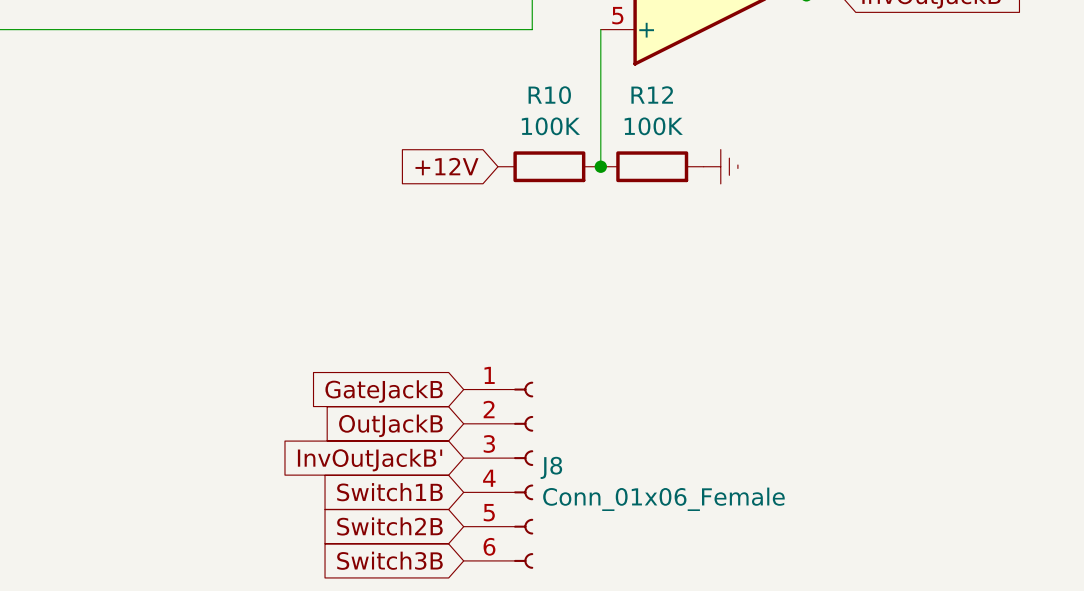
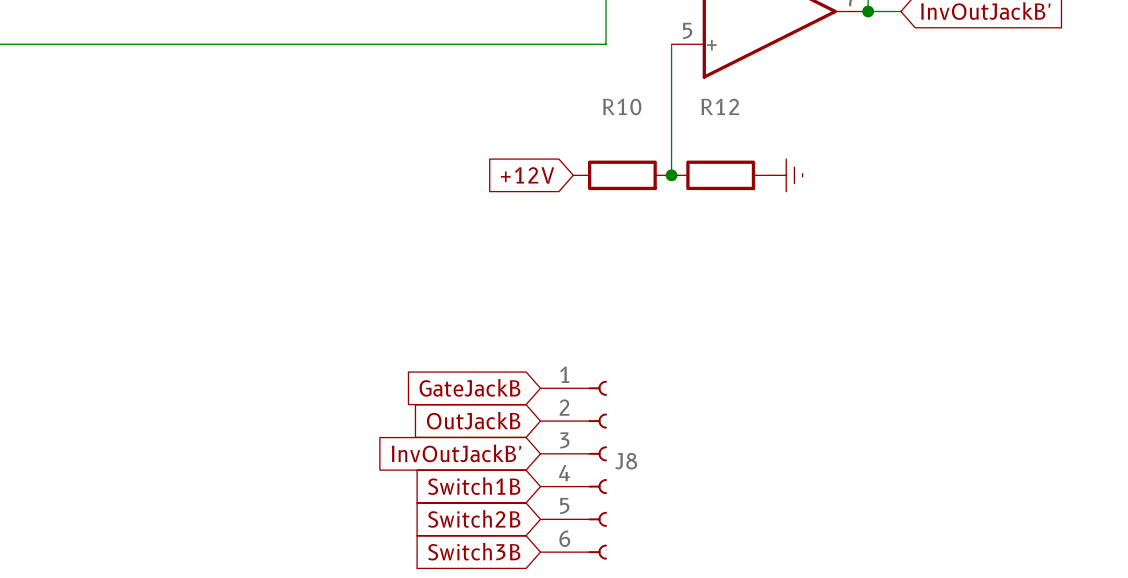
R10 value: 100K (550, 126) -> none
R12 value: 100K (653, 126) -> none
J8 value: Conn_01x06_Female (663, 499) -> none

